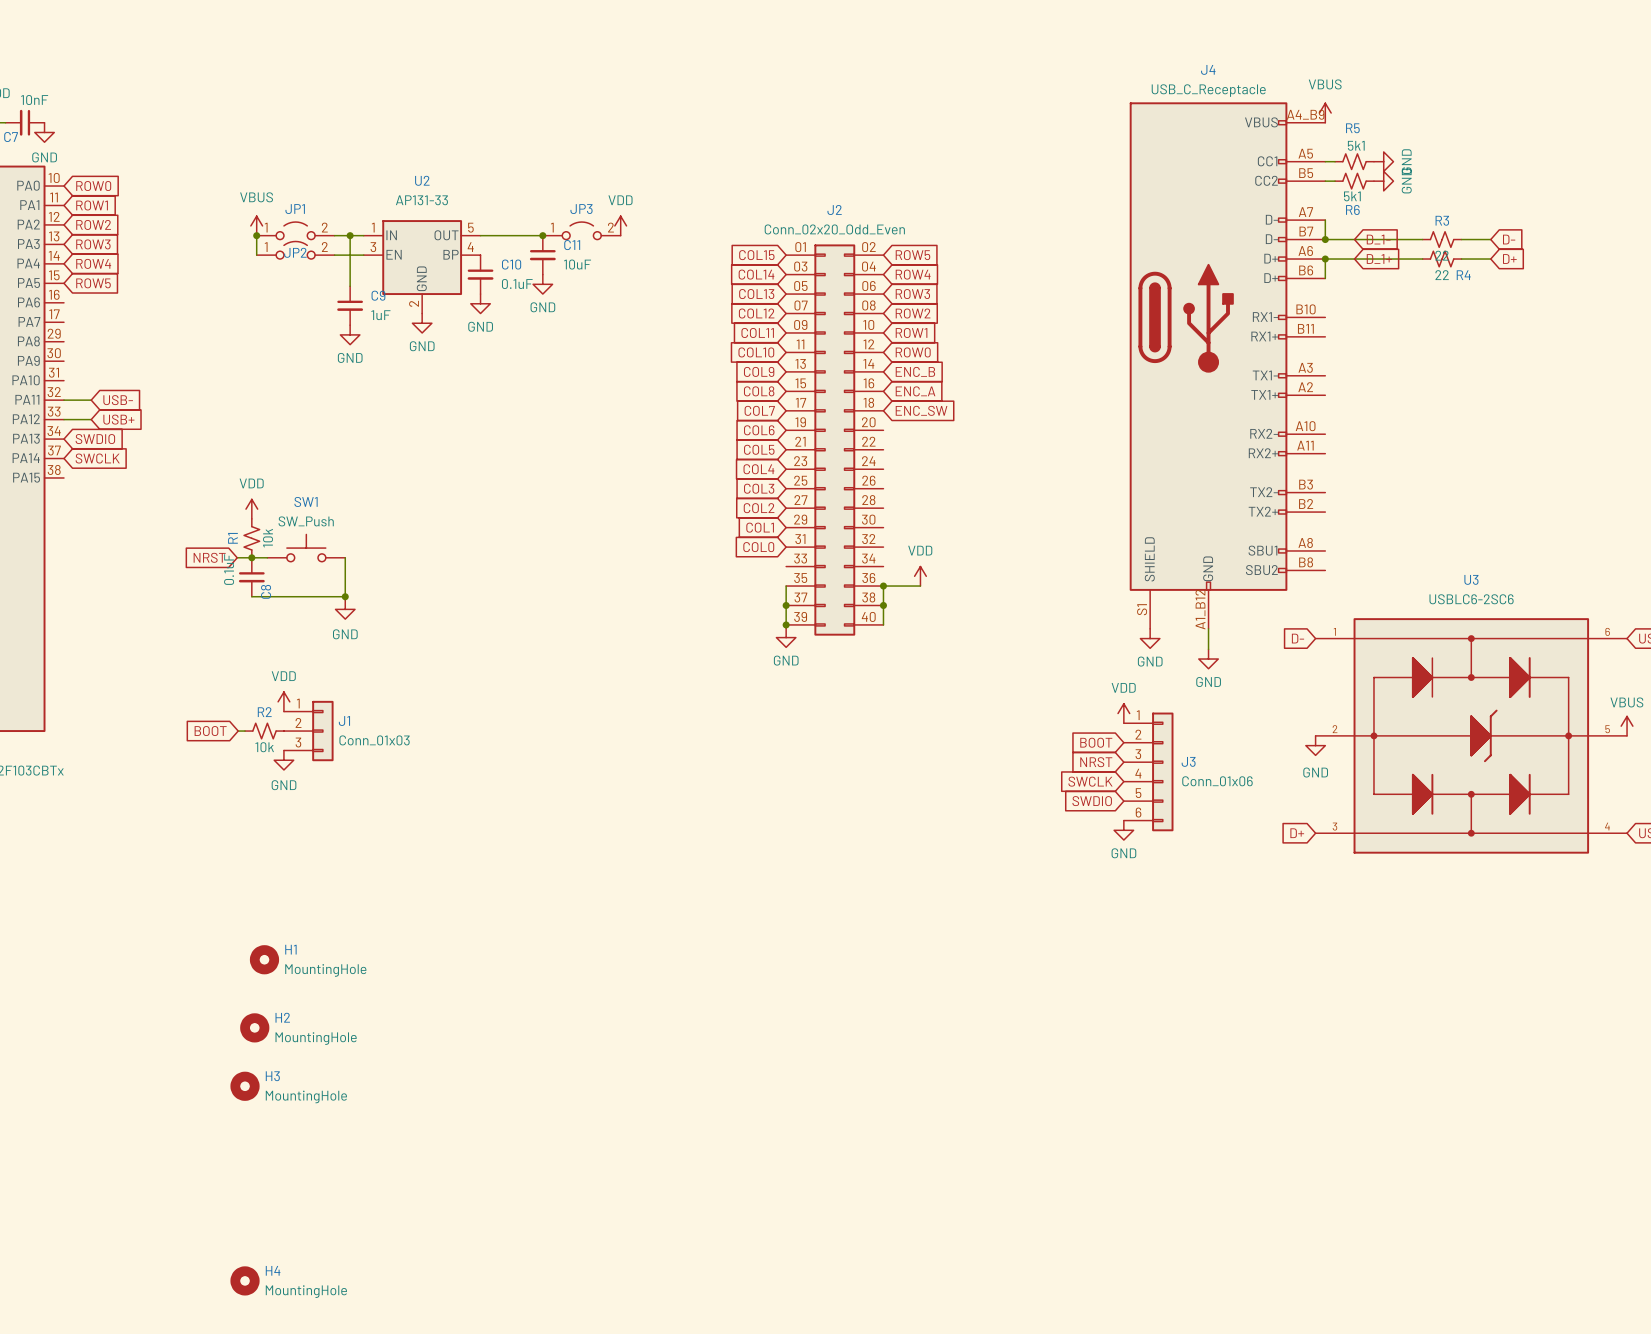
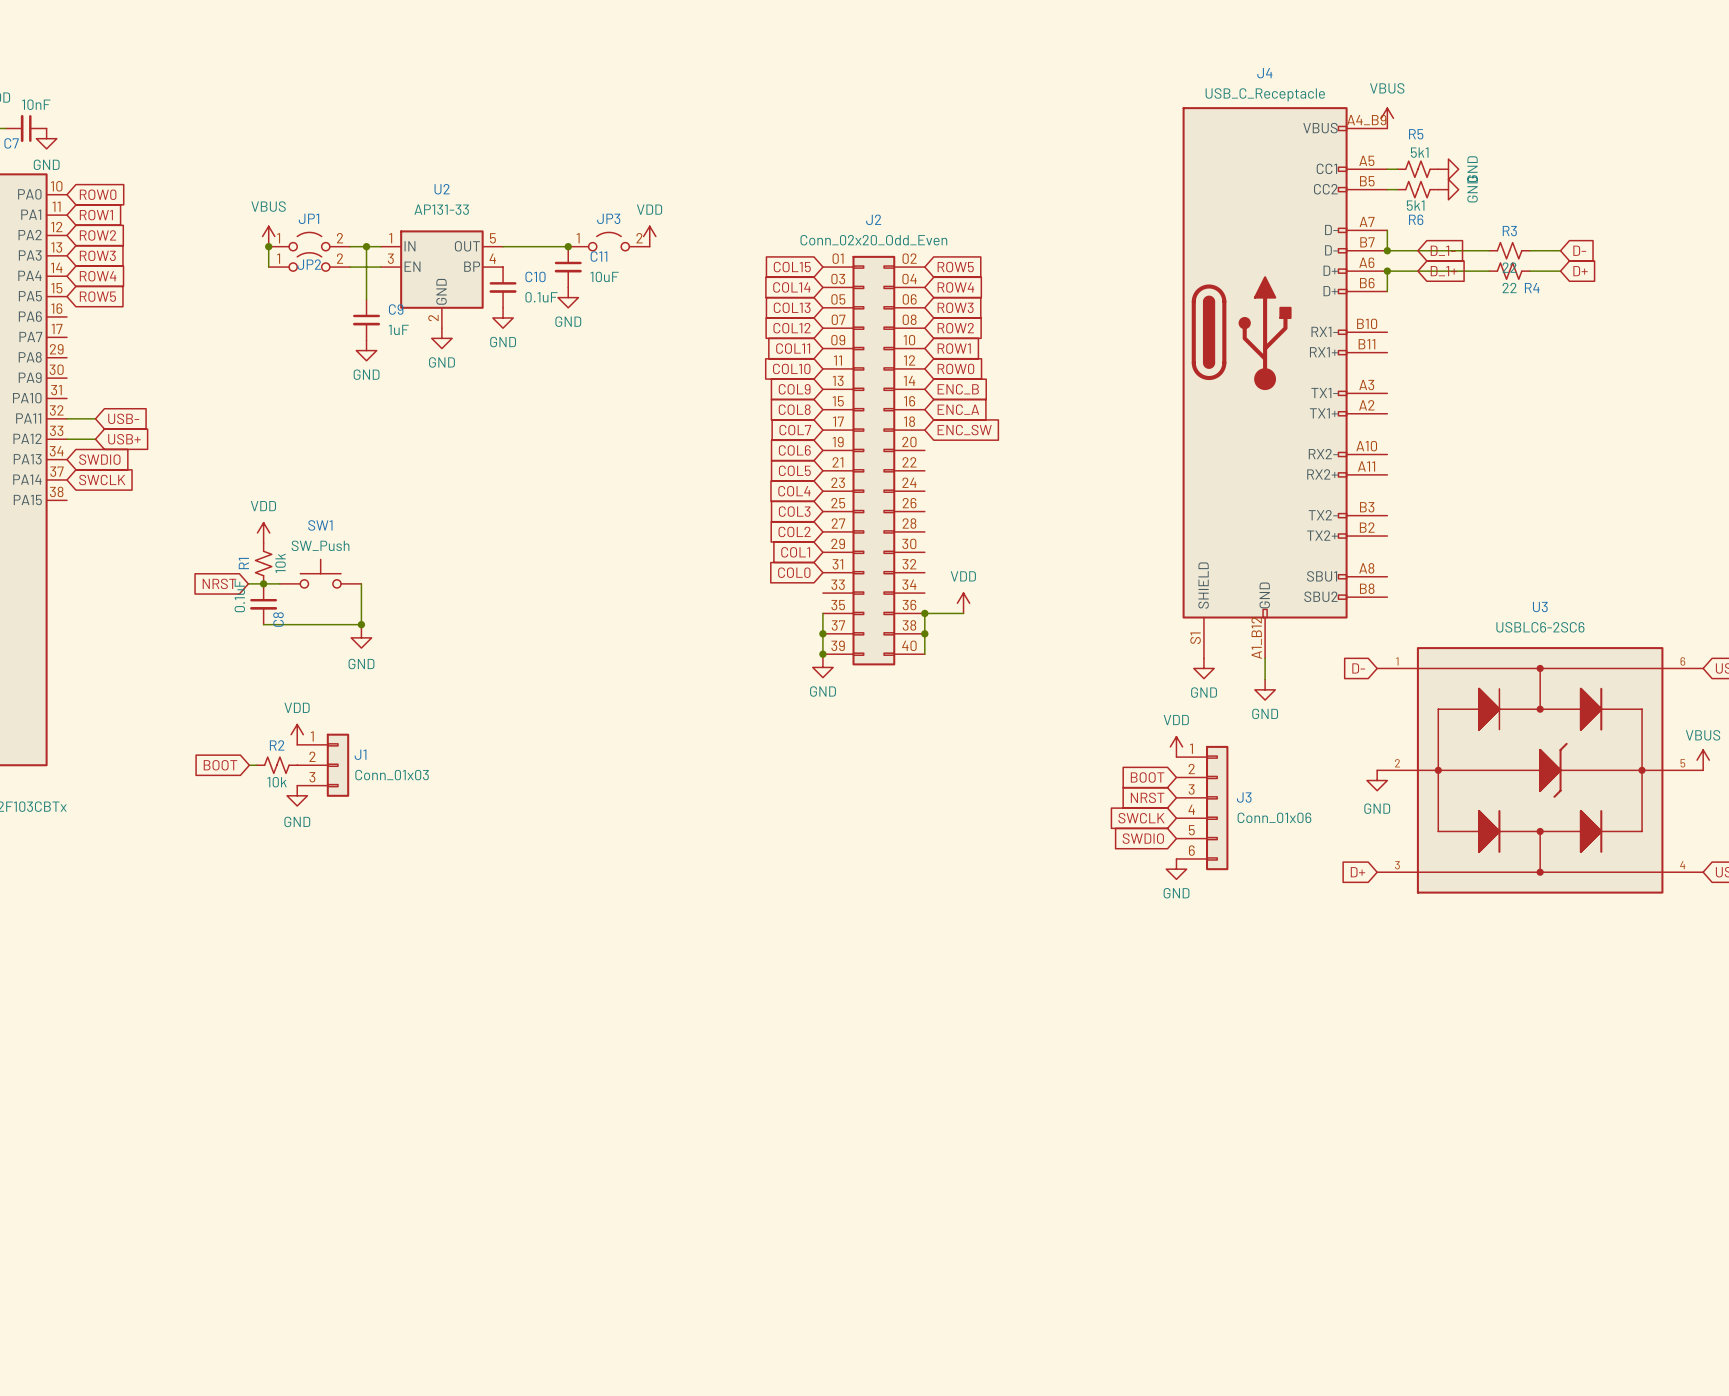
H1: MountingHole (264, 959) -> none
H2: MountingHole (254, 1027) -> none
H3: MountingHole (245, 1086) -> none
H4: MountingHole (245, 1280) -> none

